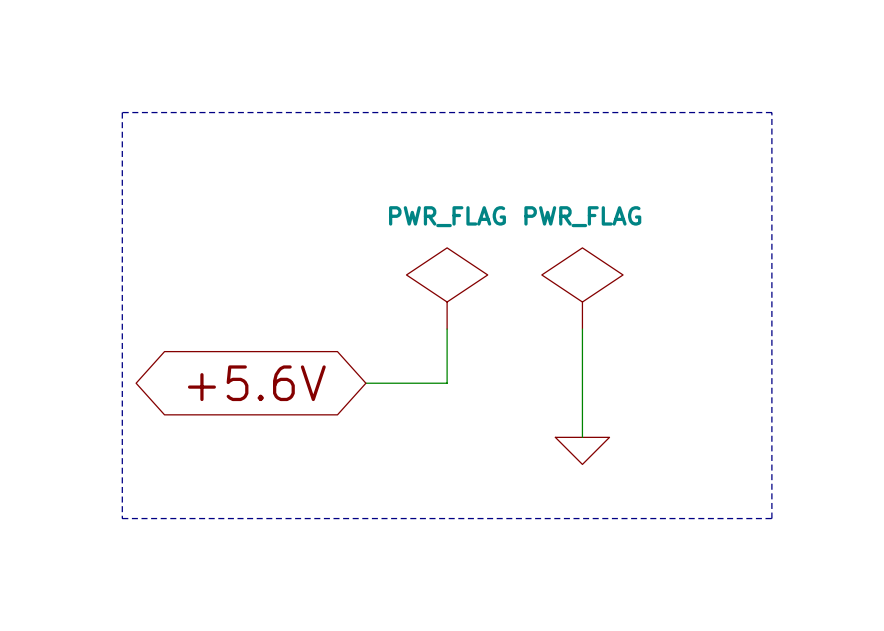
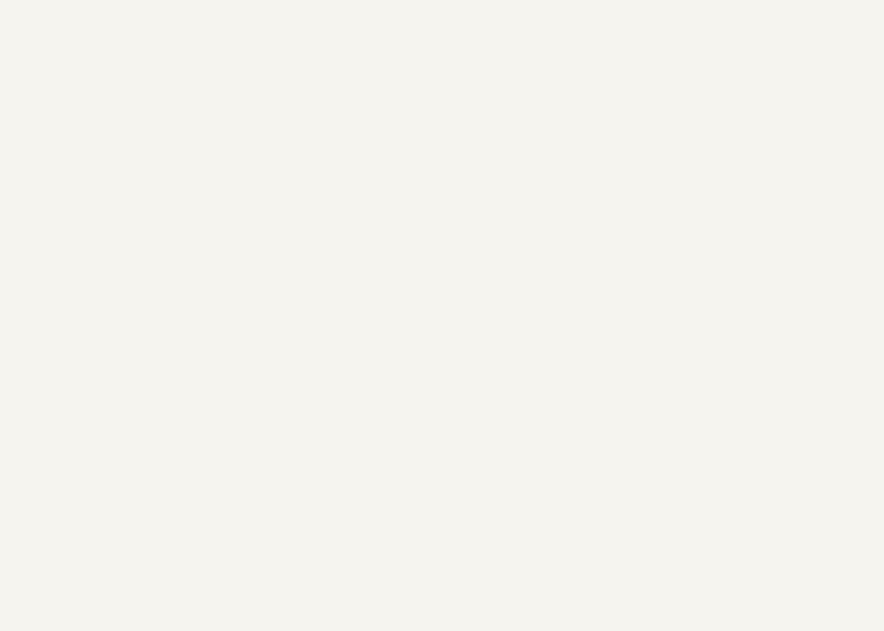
line: (122, 112) (122, 518) (771, 518) (771, 112) (122, 112) -> none
power symbol: PWR_FLAG (447, 288) -> none
power symbol: PWR_FLAG (582, 288) -> none
wire: (447, 329) (447, 383) (365, 383) -> none
wire: (582, 329) (582, 437) -> none
global label: +5.6V (256, 383) -> none
power symbol: (582, 450) -> none

